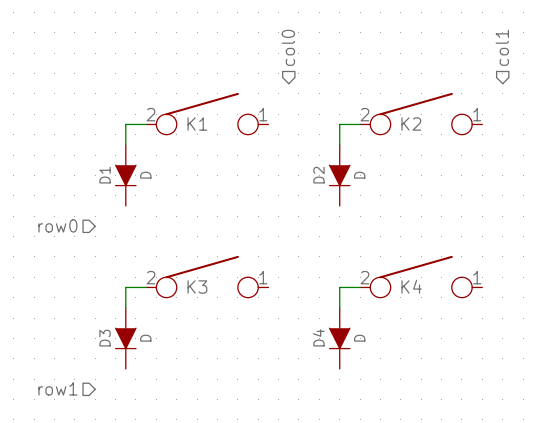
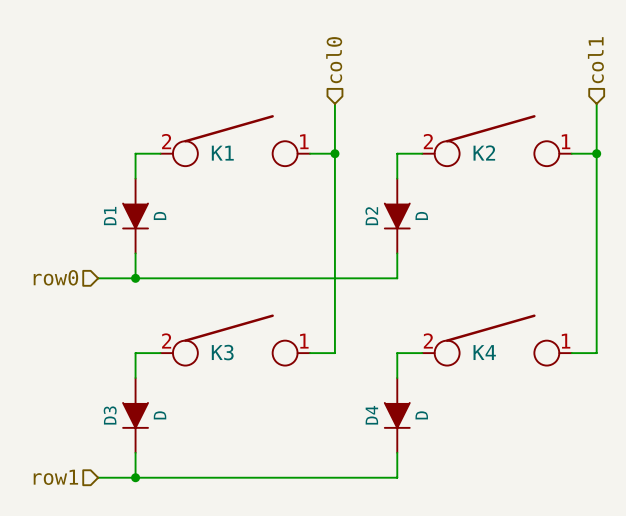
wire: none -> (334, 103) (334, 353) (310, 353)
wire: none -> (596, 103) (596, 353) (571, 353)
wire: none -> (310, 153) (334, 153)
junction: none -> (334, 153)
wire: none -> (571, 153) (596, 153)
junction: none -> (596, 153)
wire: none -> (135, 253) (135, 278)
wire: none -> (397, 253) (397, 278) (98, 278)
junction: none -> (135, 278)
wire: none -> (135, 452) (135, 477)
wire: none -> (397, 452) (397, 477) (98, 477)
junction: none -> (135, 477)

